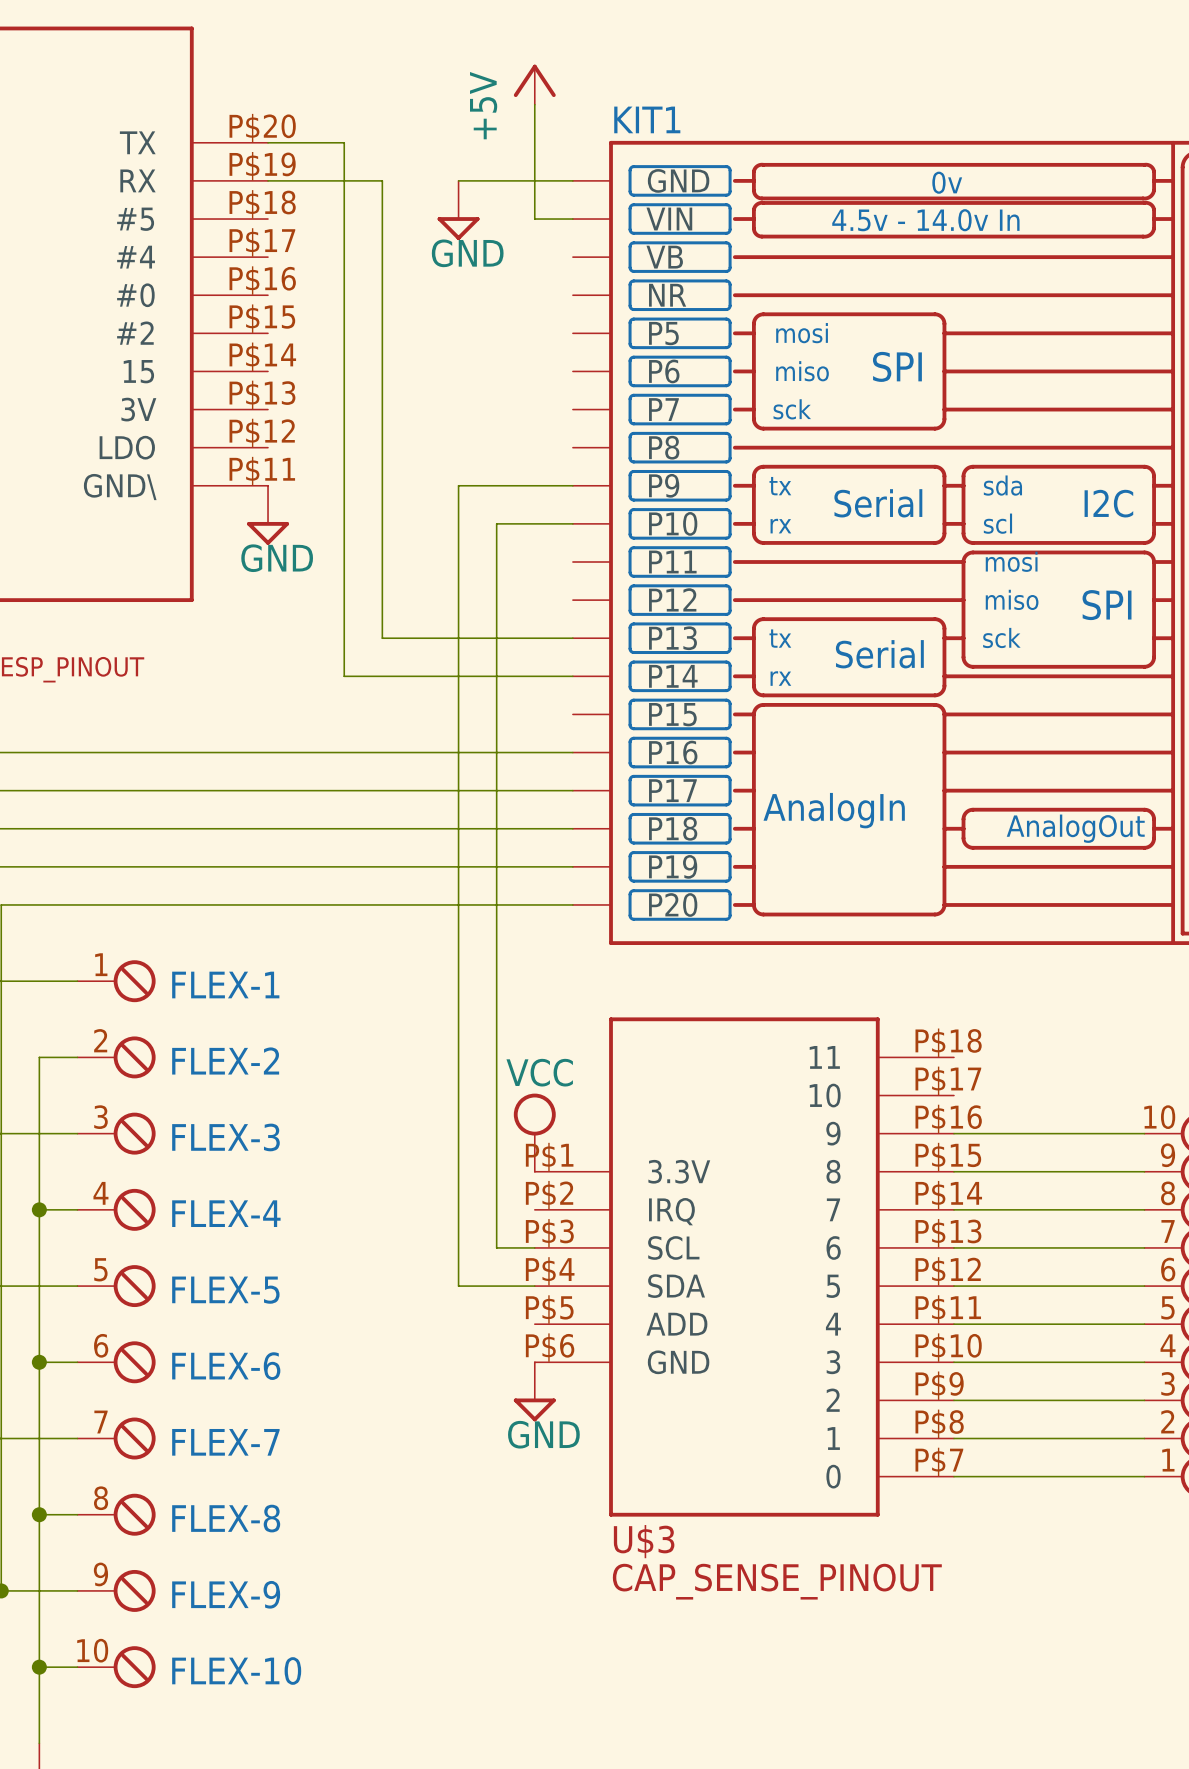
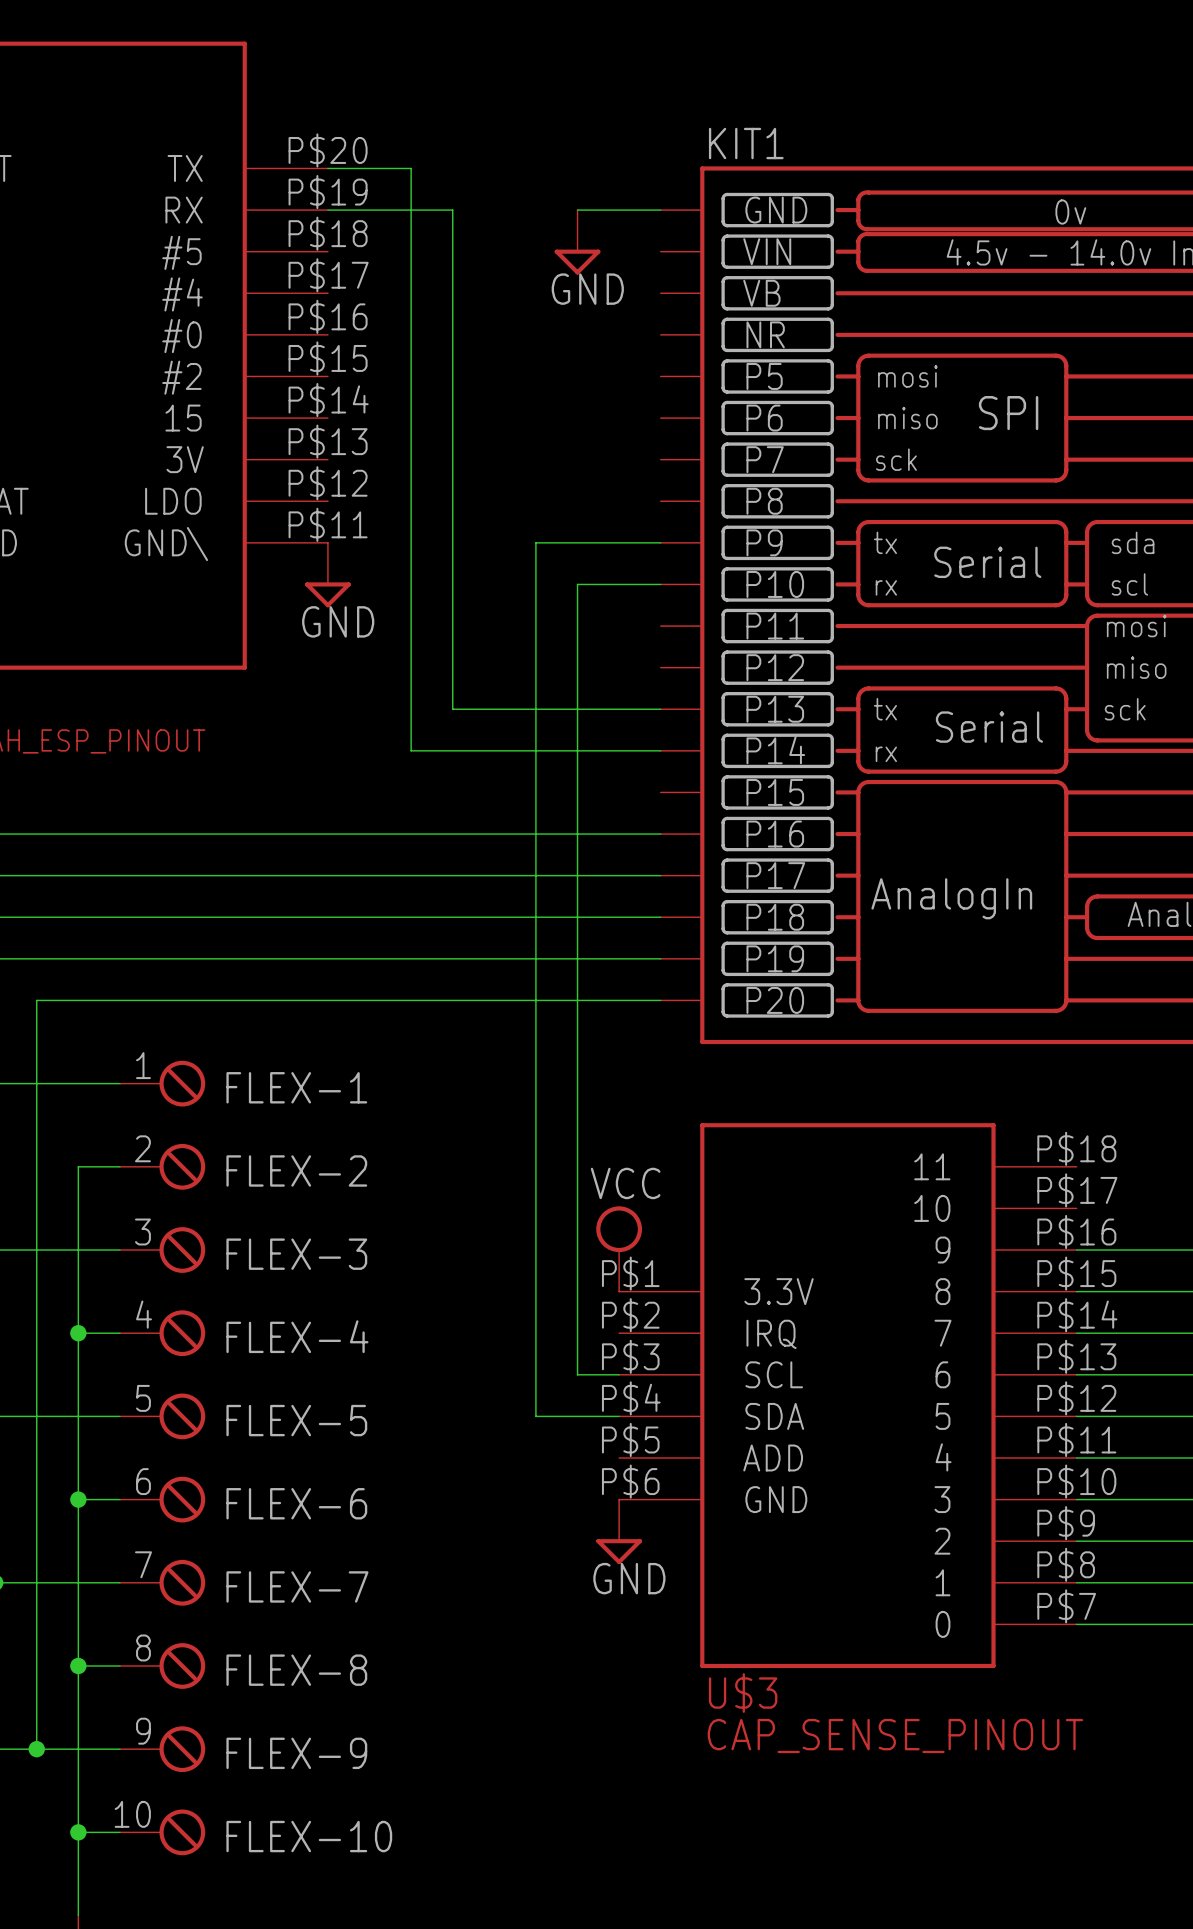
power symbol: +5V (534, 84) -> none
wire: (534, 104) (534, 219) (572, 219) -> none
wire: (458, 180) (496, 180) -> none
power symbol position: GND (458, 210) -> GND (577, 242)

